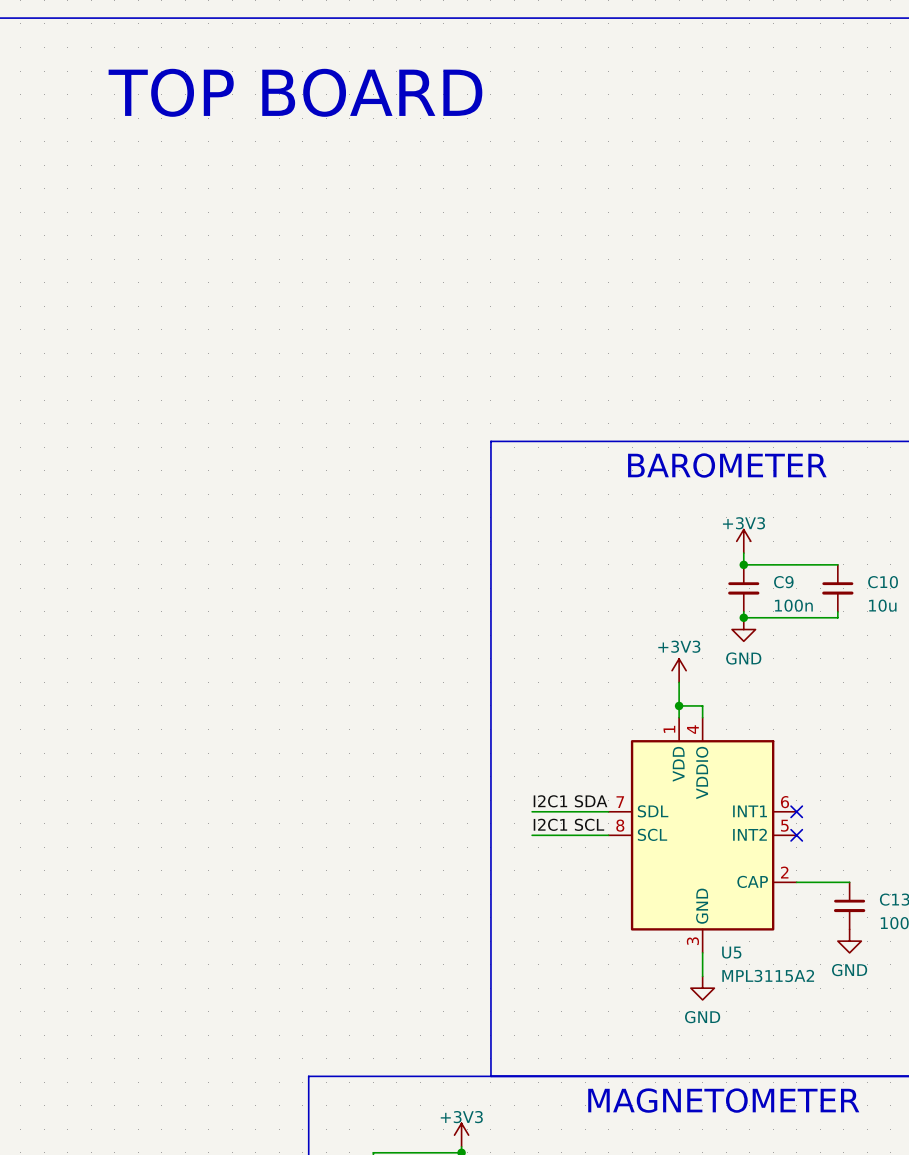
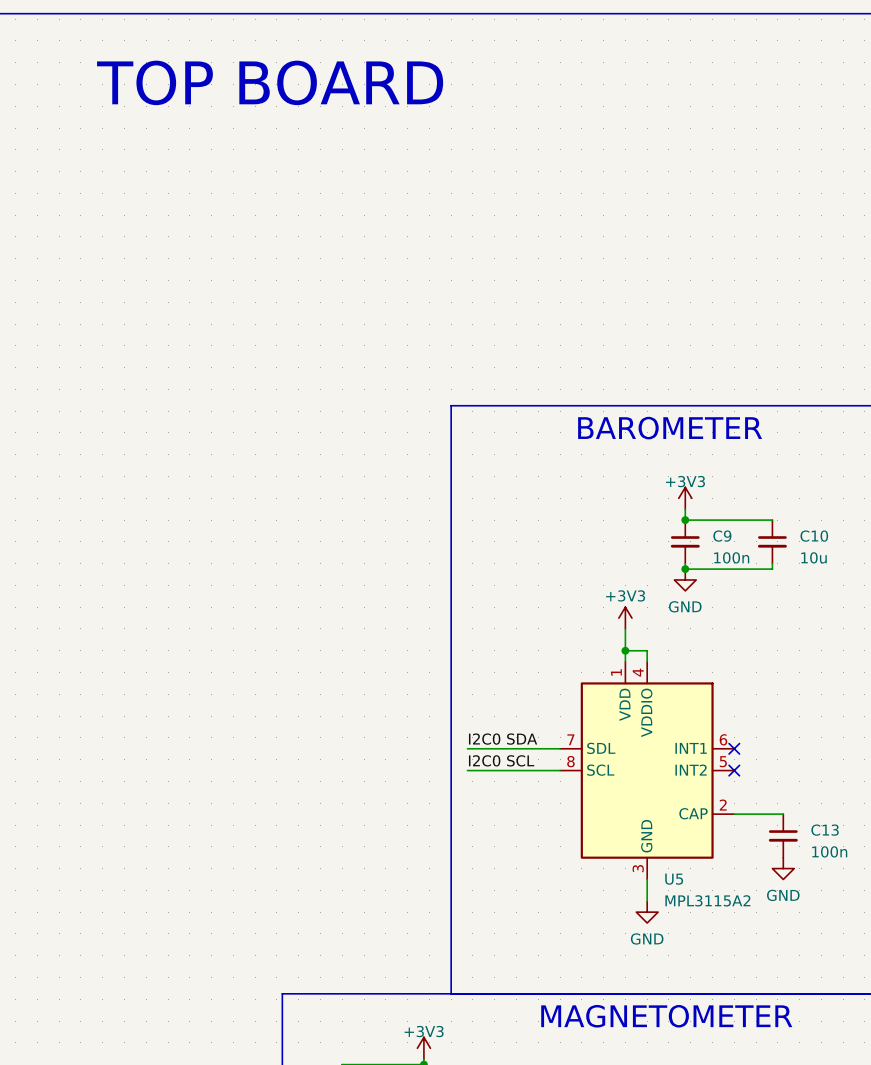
label: none -> I2C0 SDA (503, 739)
label: I2C1 SDA (570, 801) -> none
wire: none -> (467, 748) (489, 748)
label: none -> I2C0 SCL (501, 760)
label: I2C1 SCL (568, 824) -> none
wire: none -> (467, 770) (489, 770)

